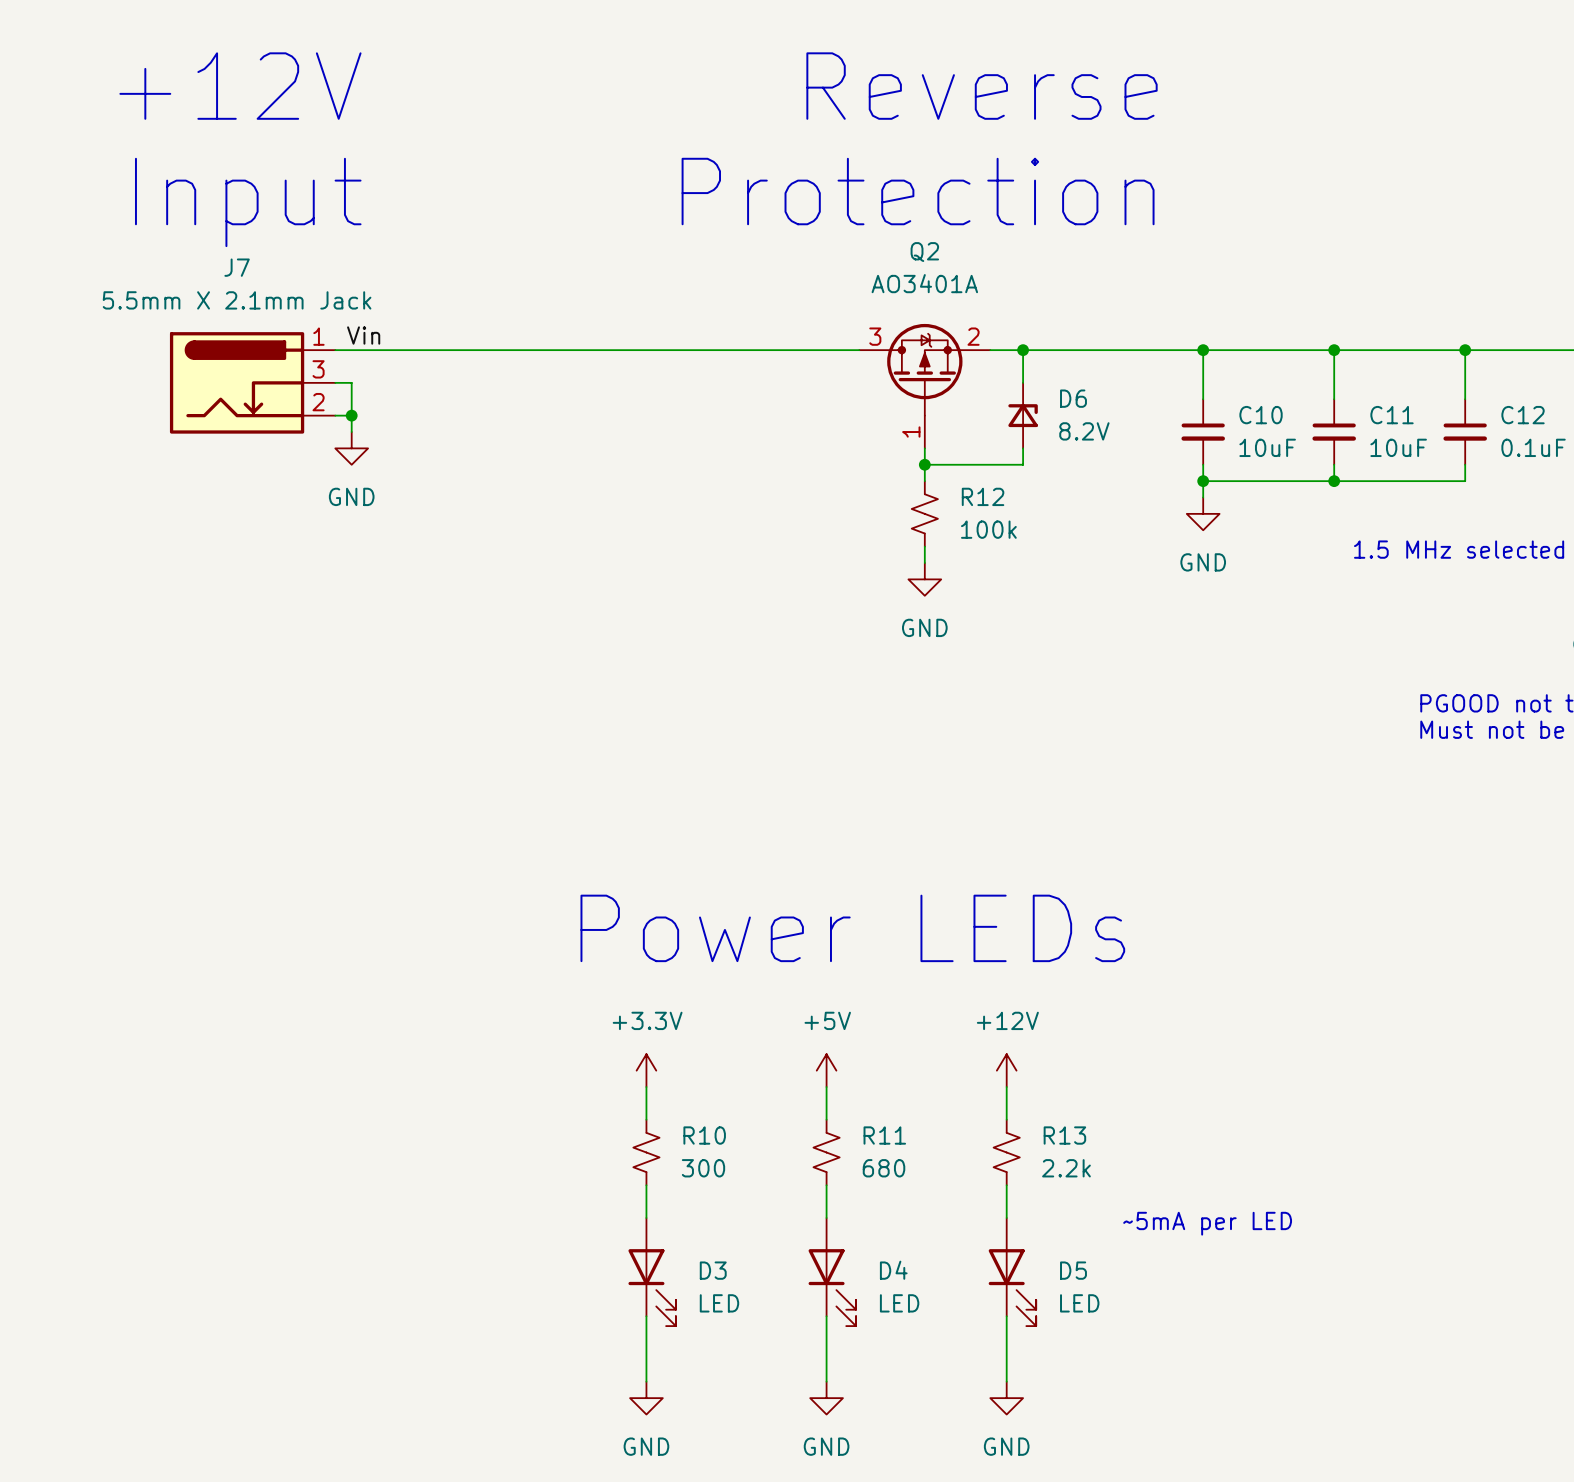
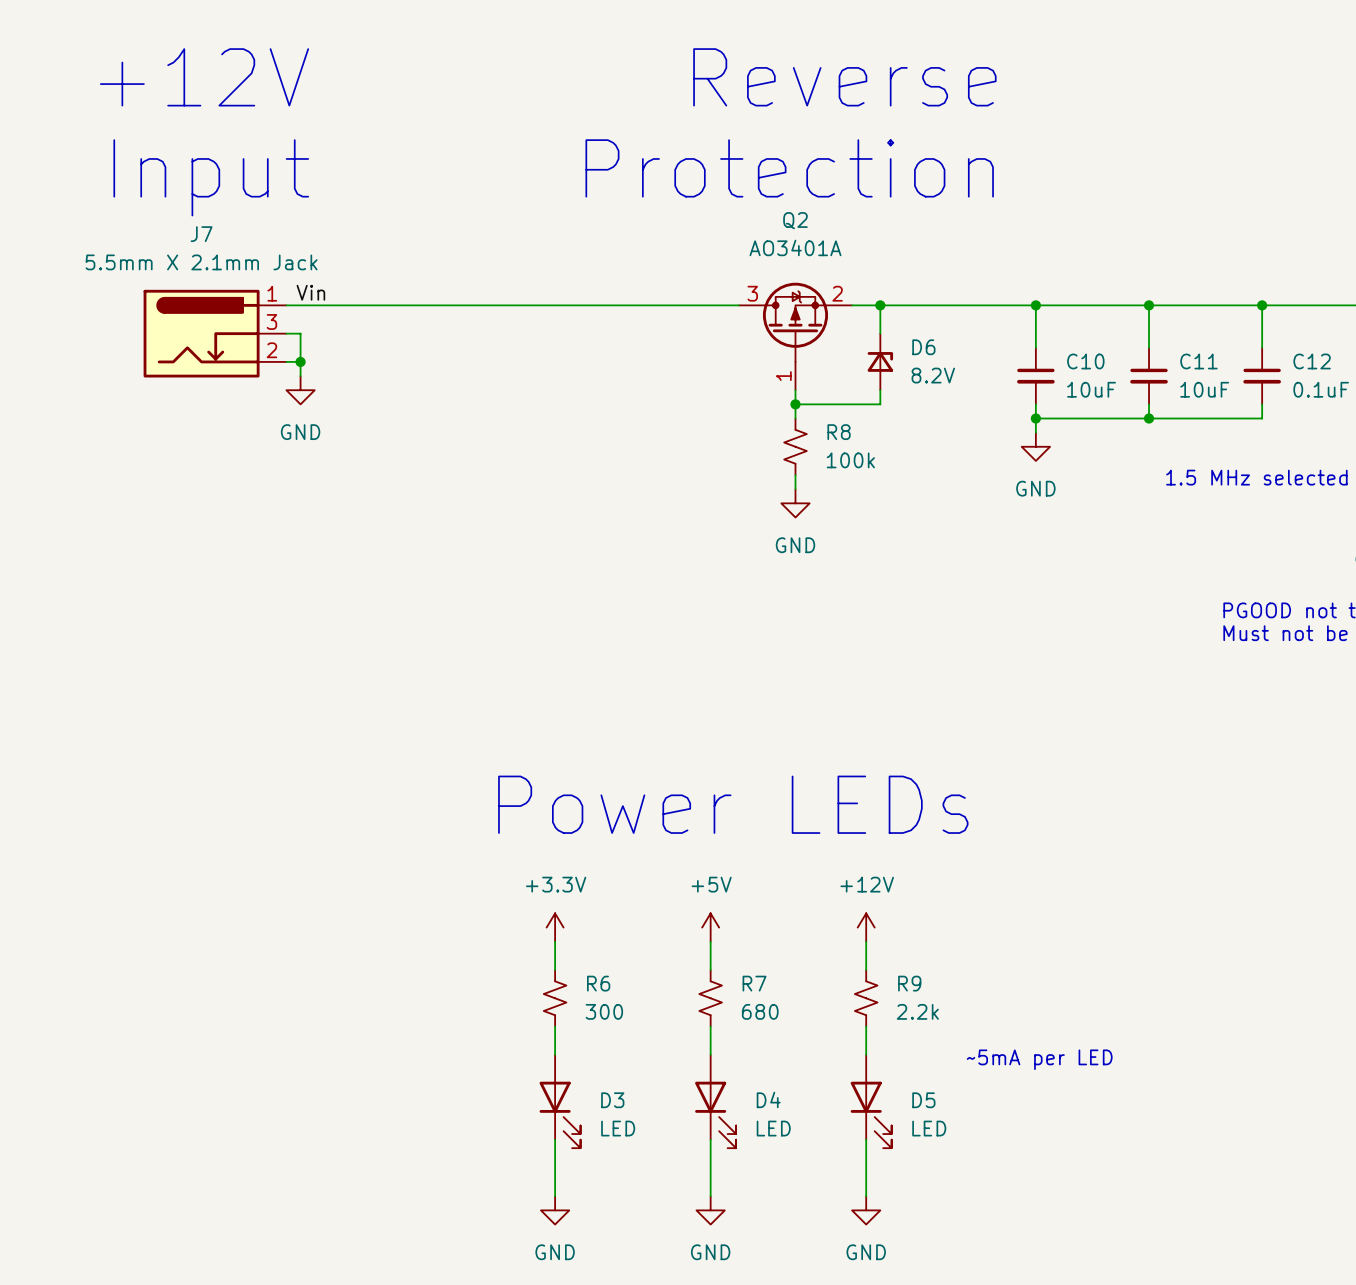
R12 name: R12 (983, 496) -> R8 (839, 432)
R10 name: R10 (704, 1135) -> R6 (598, 983)
R11 name: R11 (884, 1135) -> R7 (754, 983)
R13 name: R13 (1064, 1135) -> R9 (909, 983)

